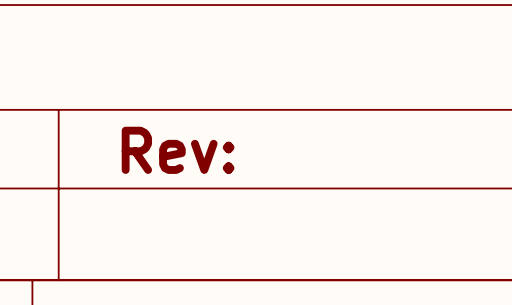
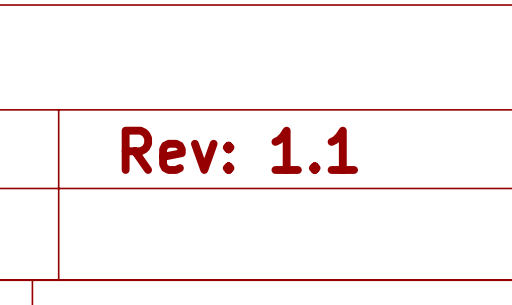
title block: Rev: (178, 150) -> Rev: 1.1 (239, 150)

